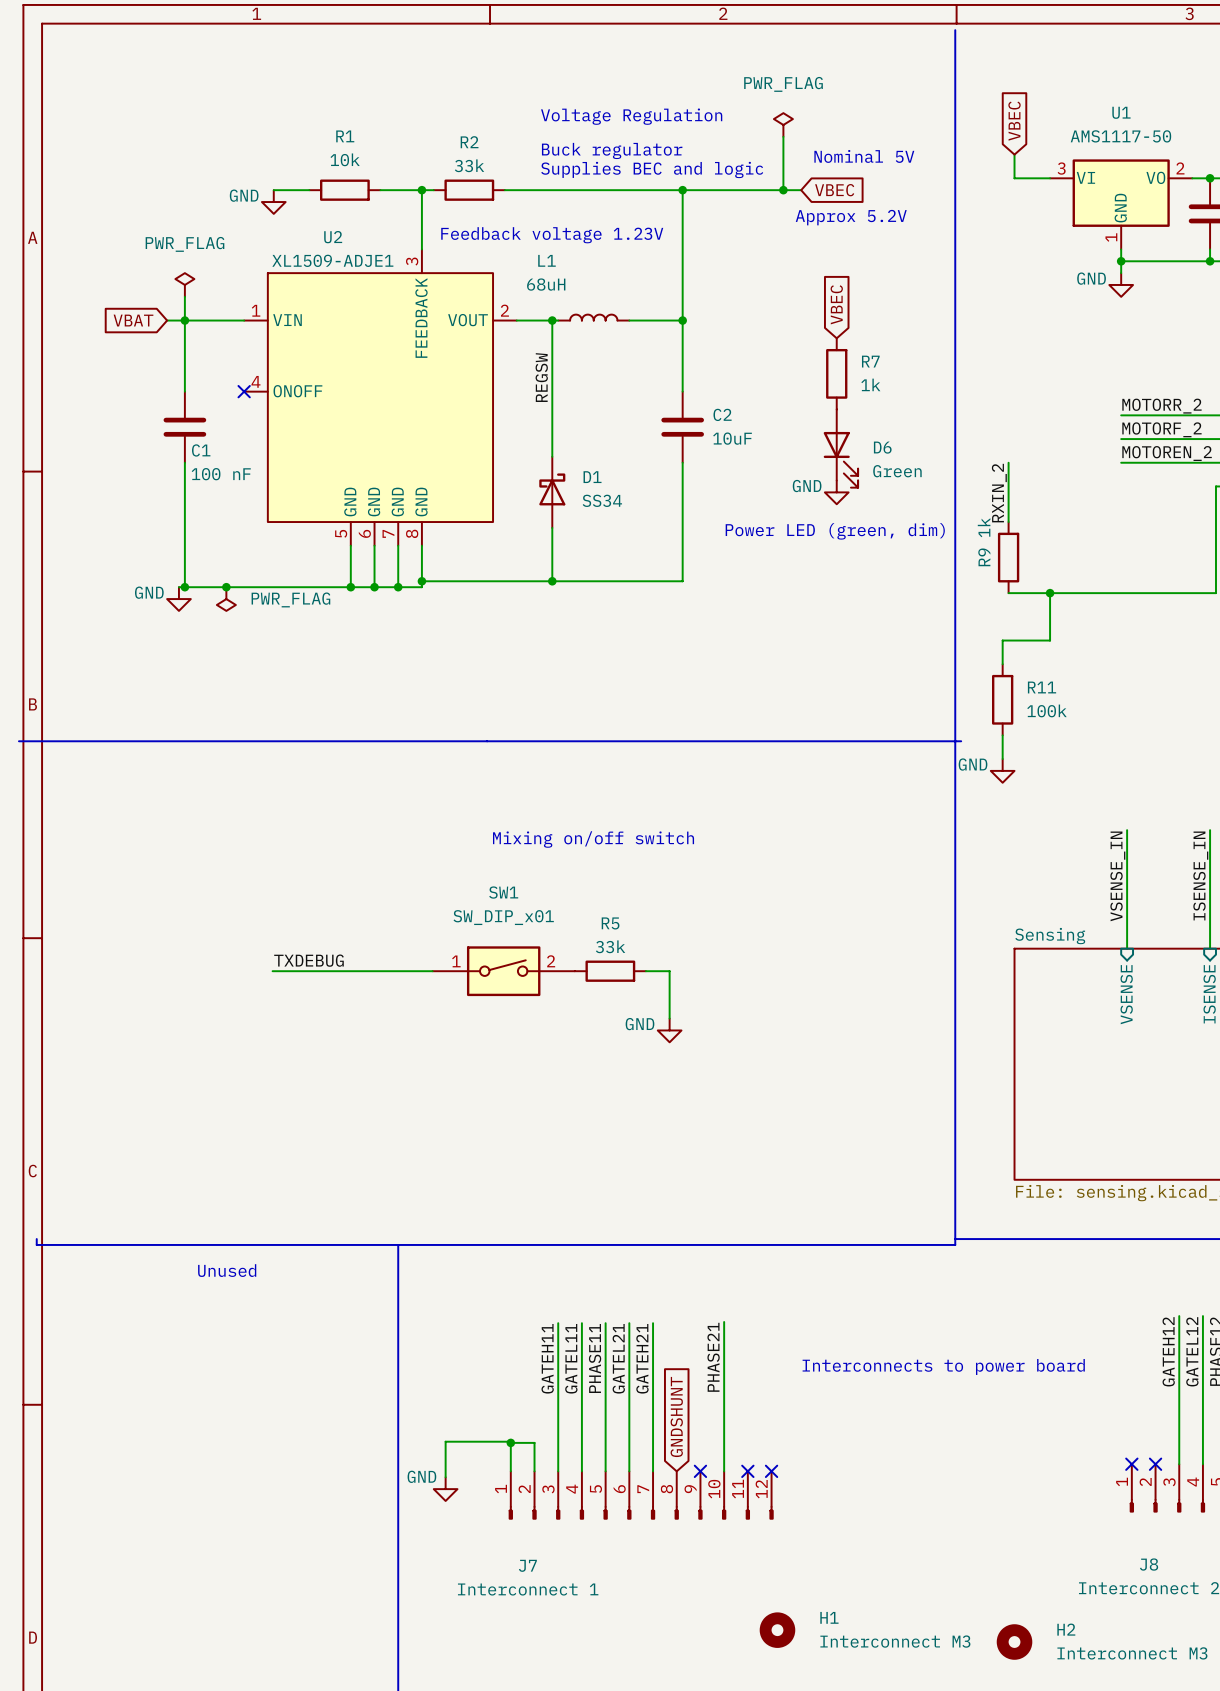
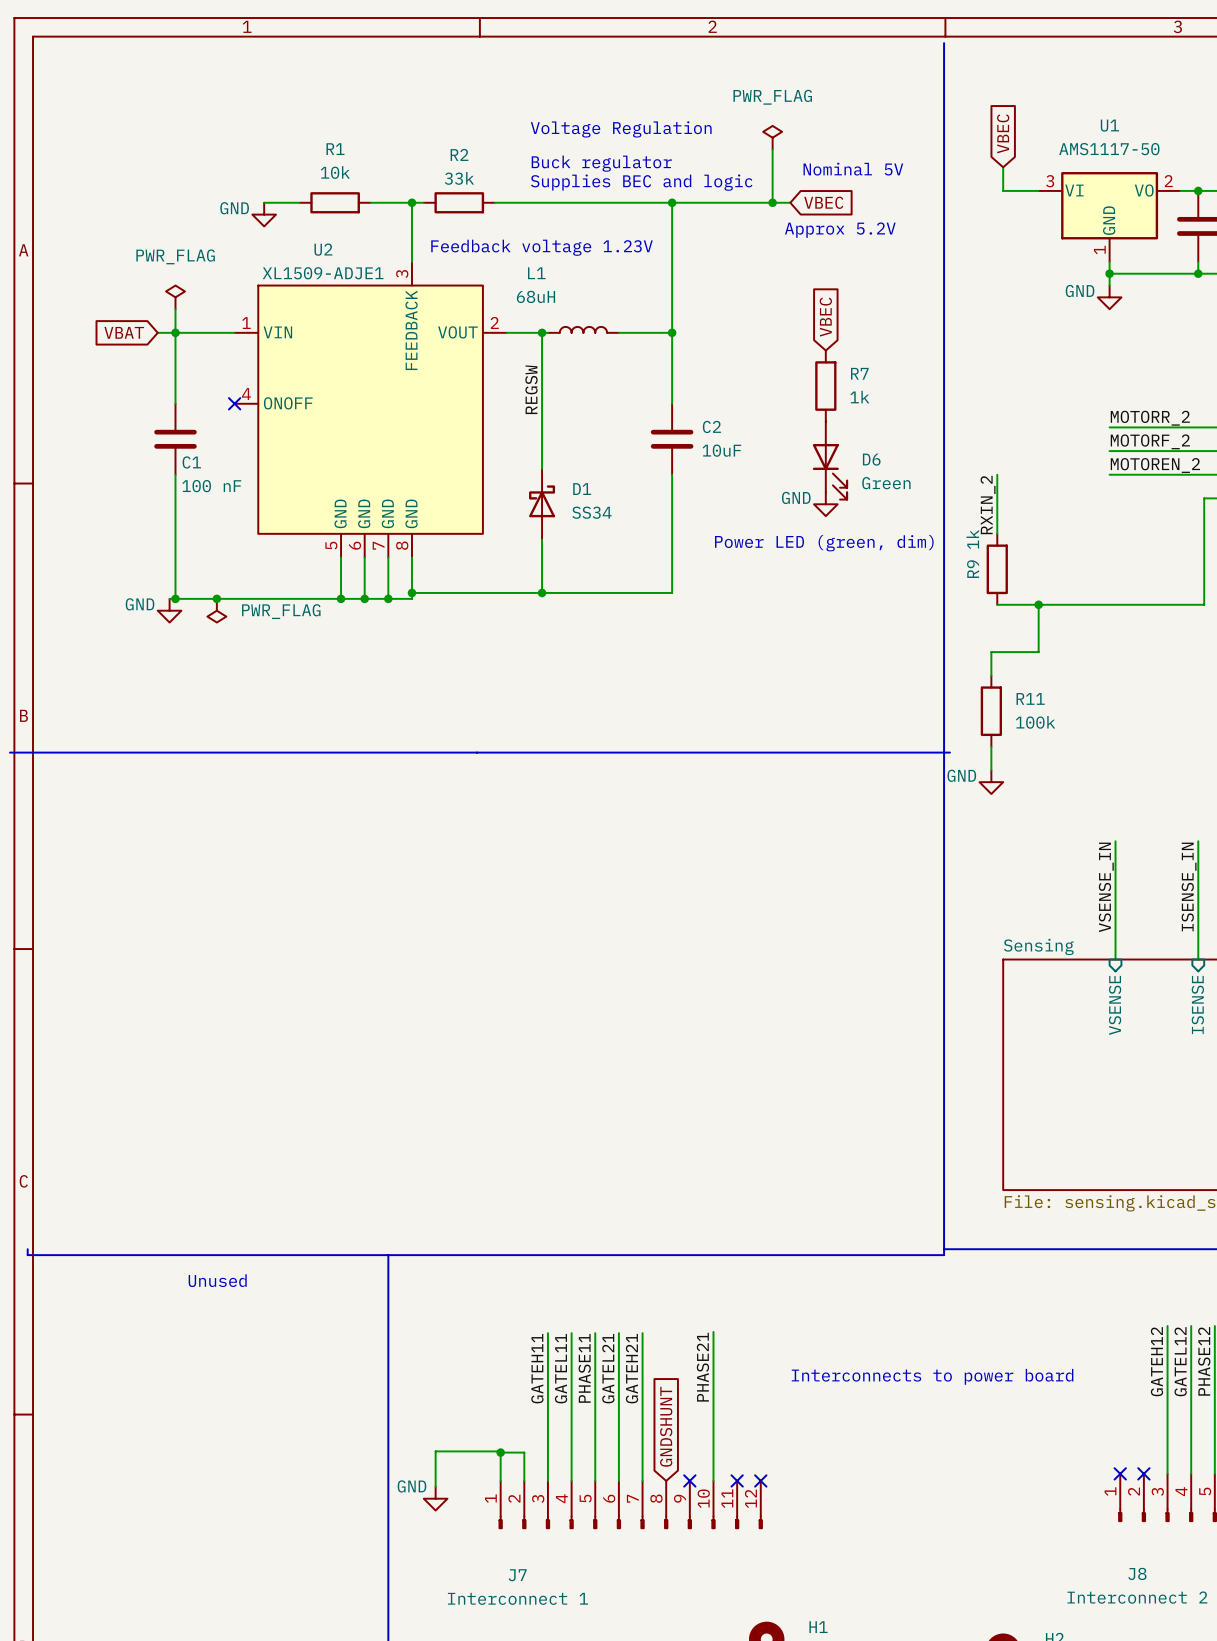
text: Mixing on/off switch (593, 839) -> none
label: TXDEBUG (308, 960) -> none
wire: (272, 971) (432, 971) -> none
SW1: SW_DIP_x01 (503, 971) -> none
R5: 33k (610, 971) -> none
wire: (645, 971) (669, 971) (669, 1018) -> none
power symbol: GND (669, 1030) -> none

